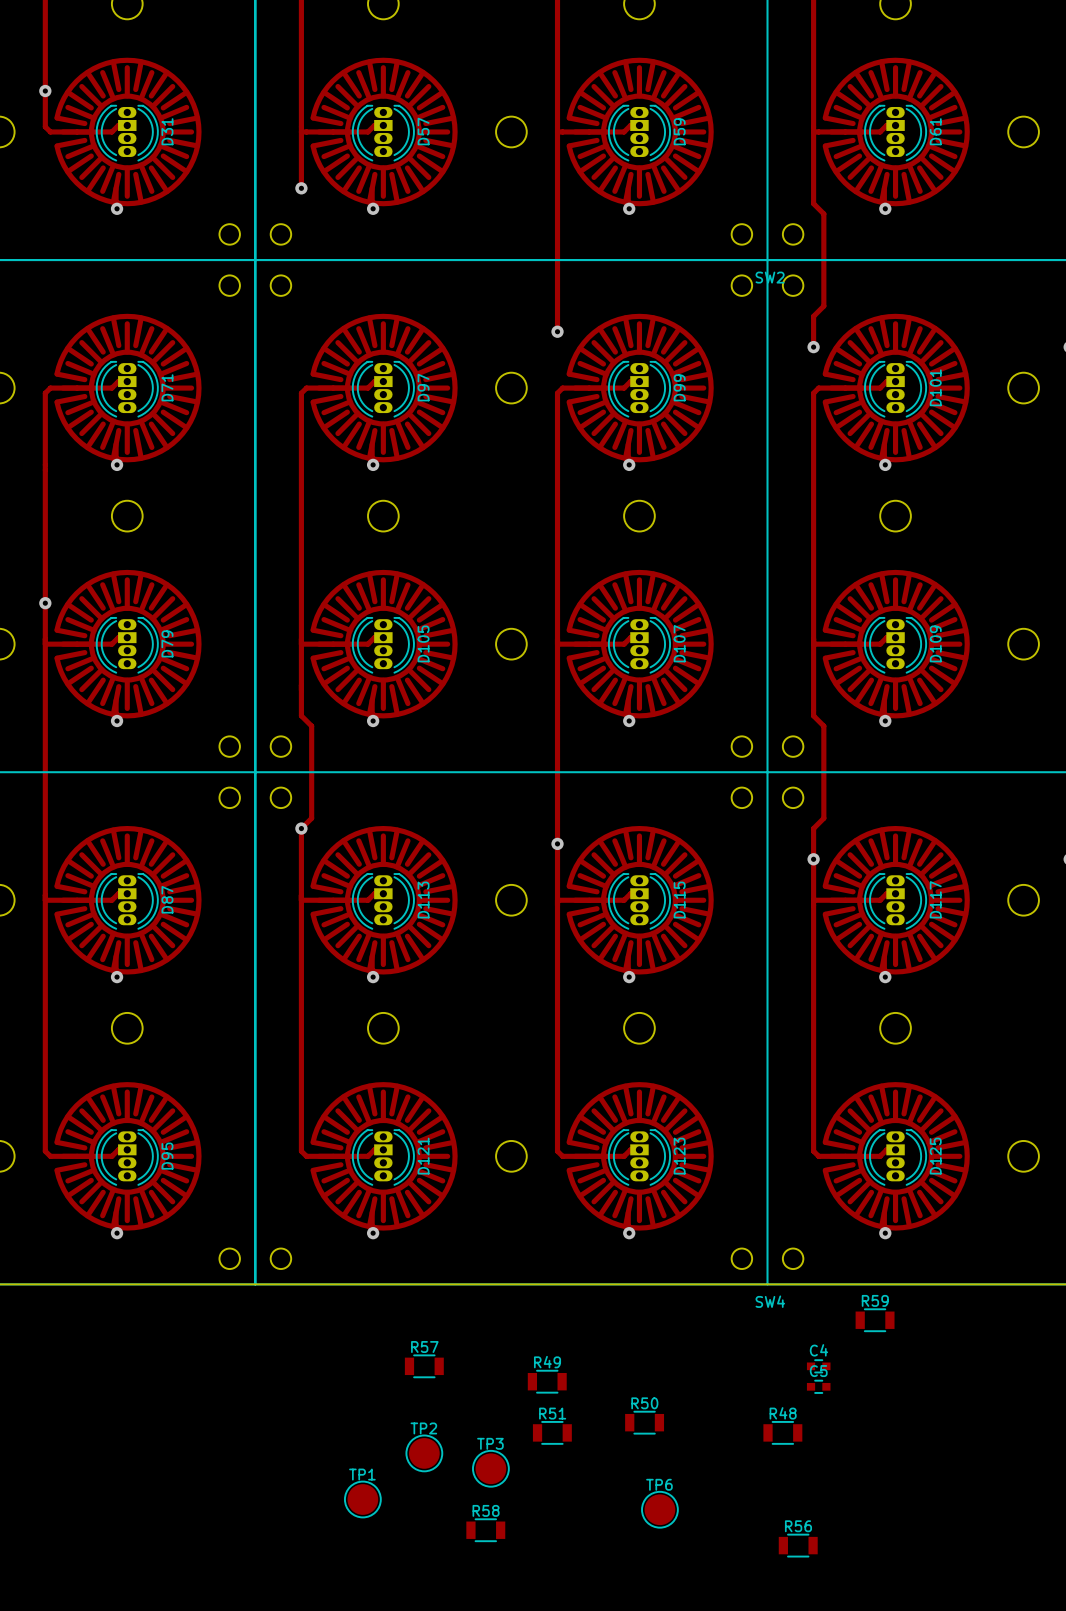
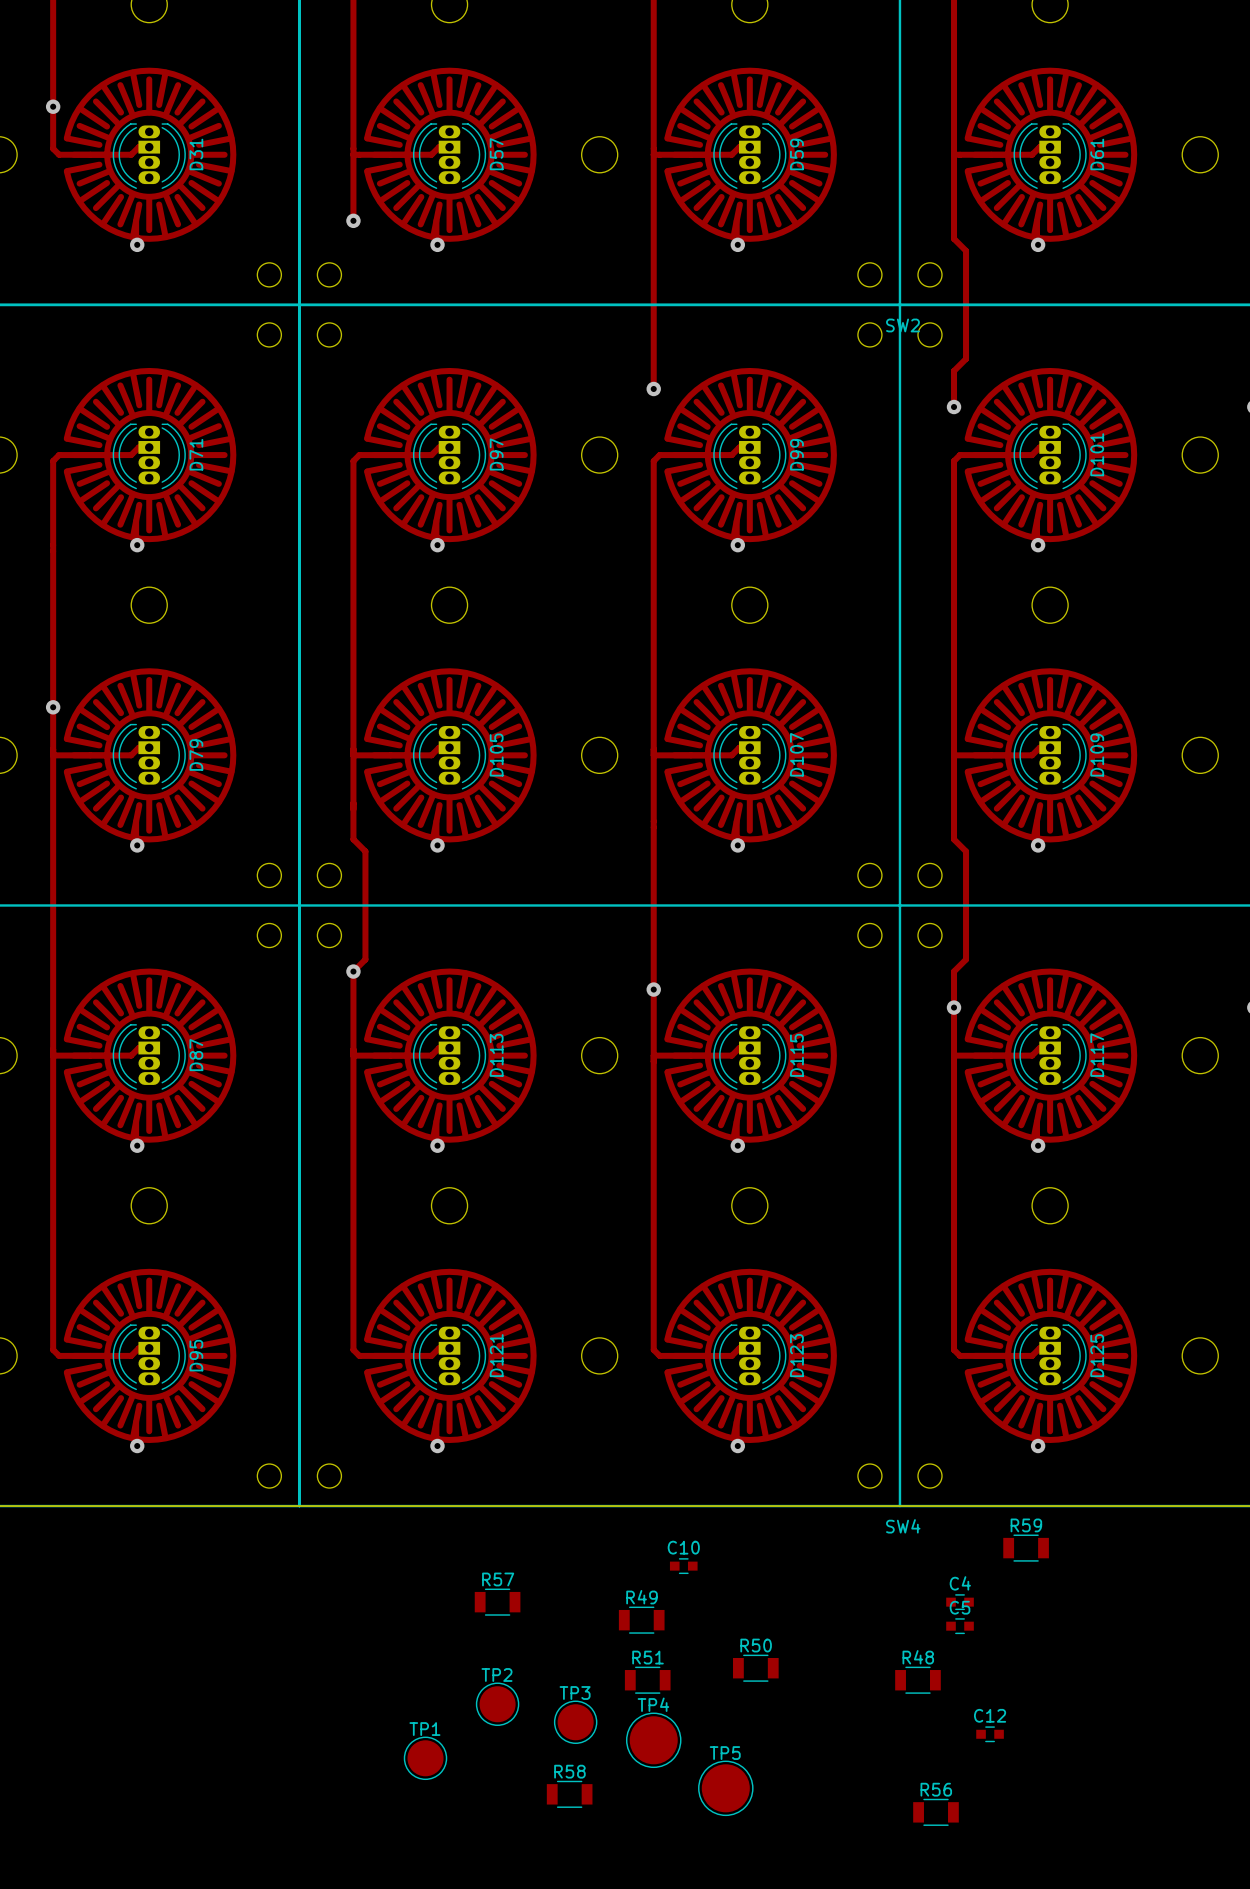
C10: none -> (683, 1566)
C12: none -> (990, 1734)
TP4: none -> (653, 1740)
TP6: (659, 1509) -> none
TP5: none -> (725, 1788)

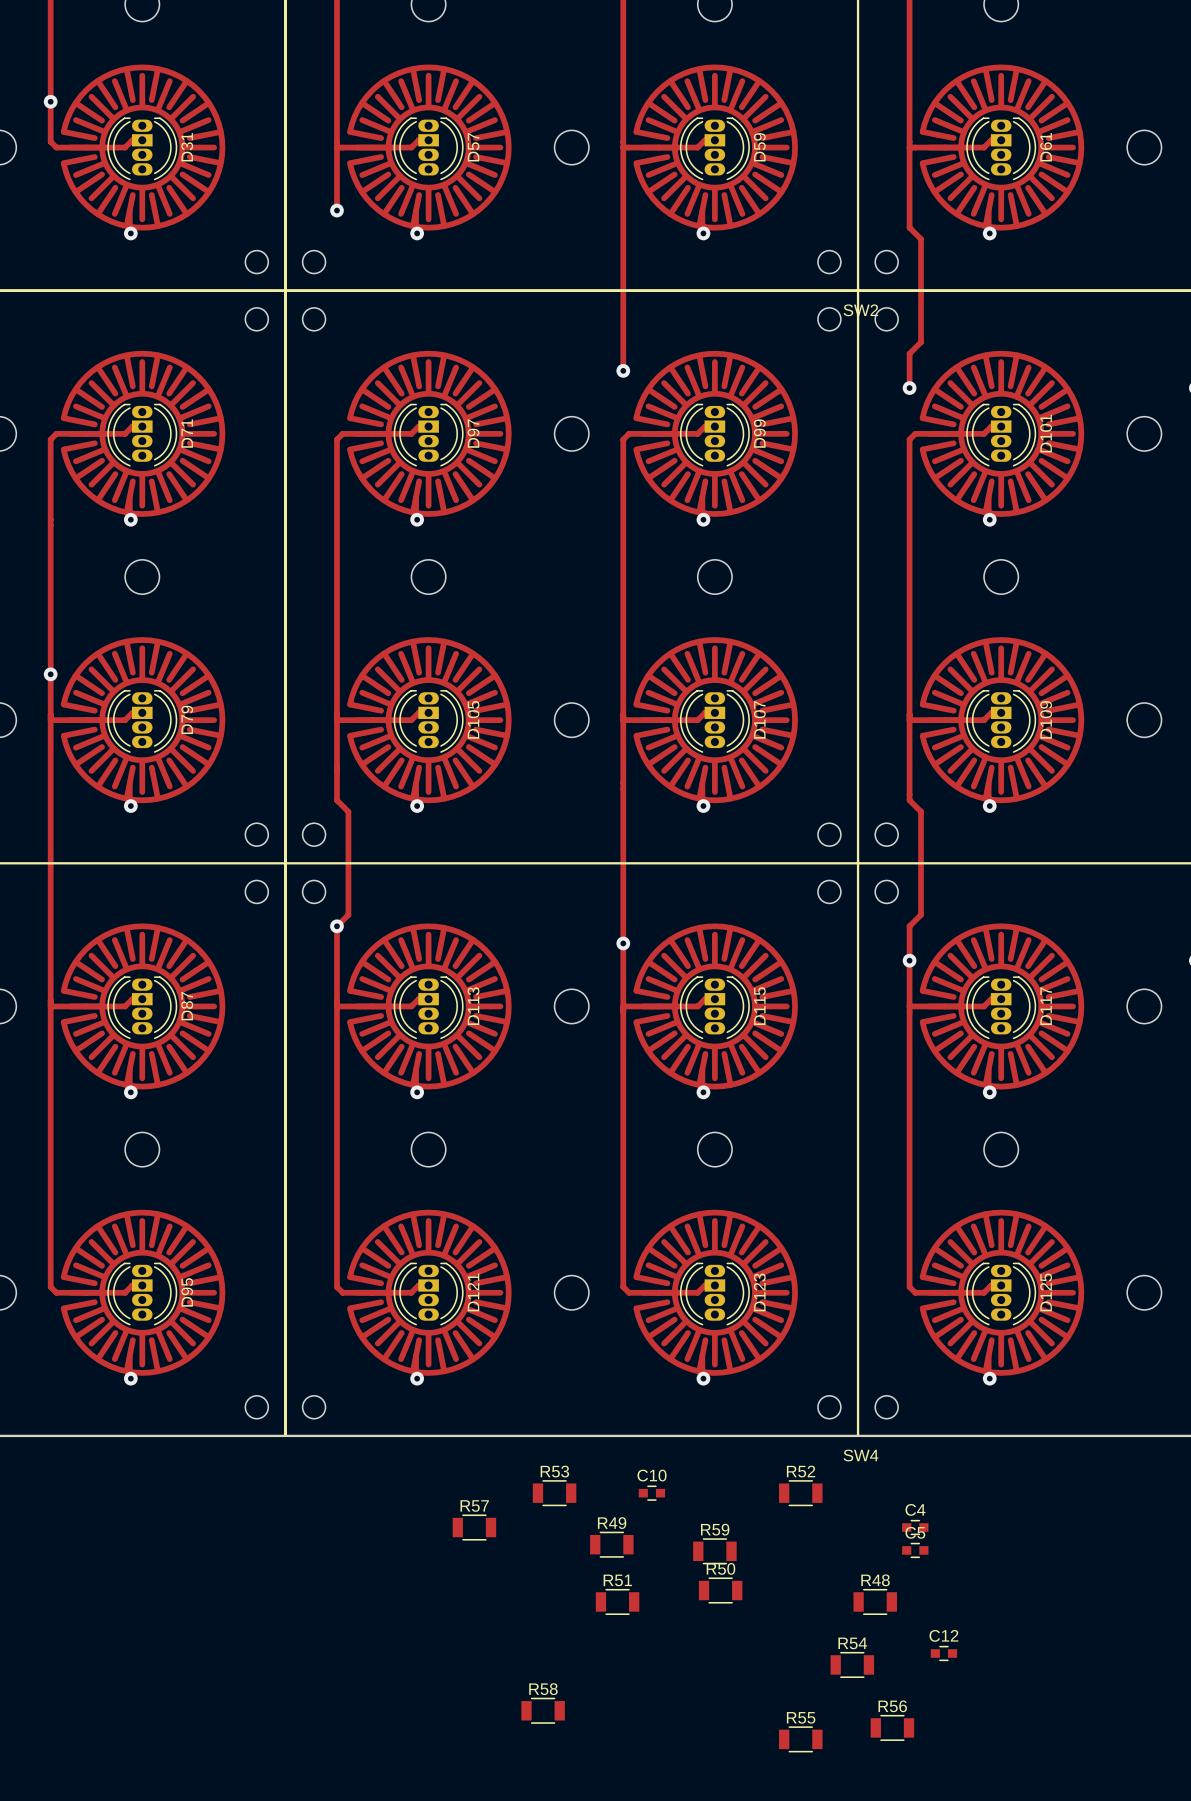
R59 position: (1026, 1548) -> (714, 1551)
R53: none -> (554, 1493)
R52: none -> (800, 1493)
TP2: (497, 1704) -> none
TP3: (575, 1722) -> none
TP4: (653, 1740) -> none
R54: none -> (852, 1664)
TP1: (425, 1758) -> none
TP5: (725, 1788) -> none
R55: none -> (800, 1739)

